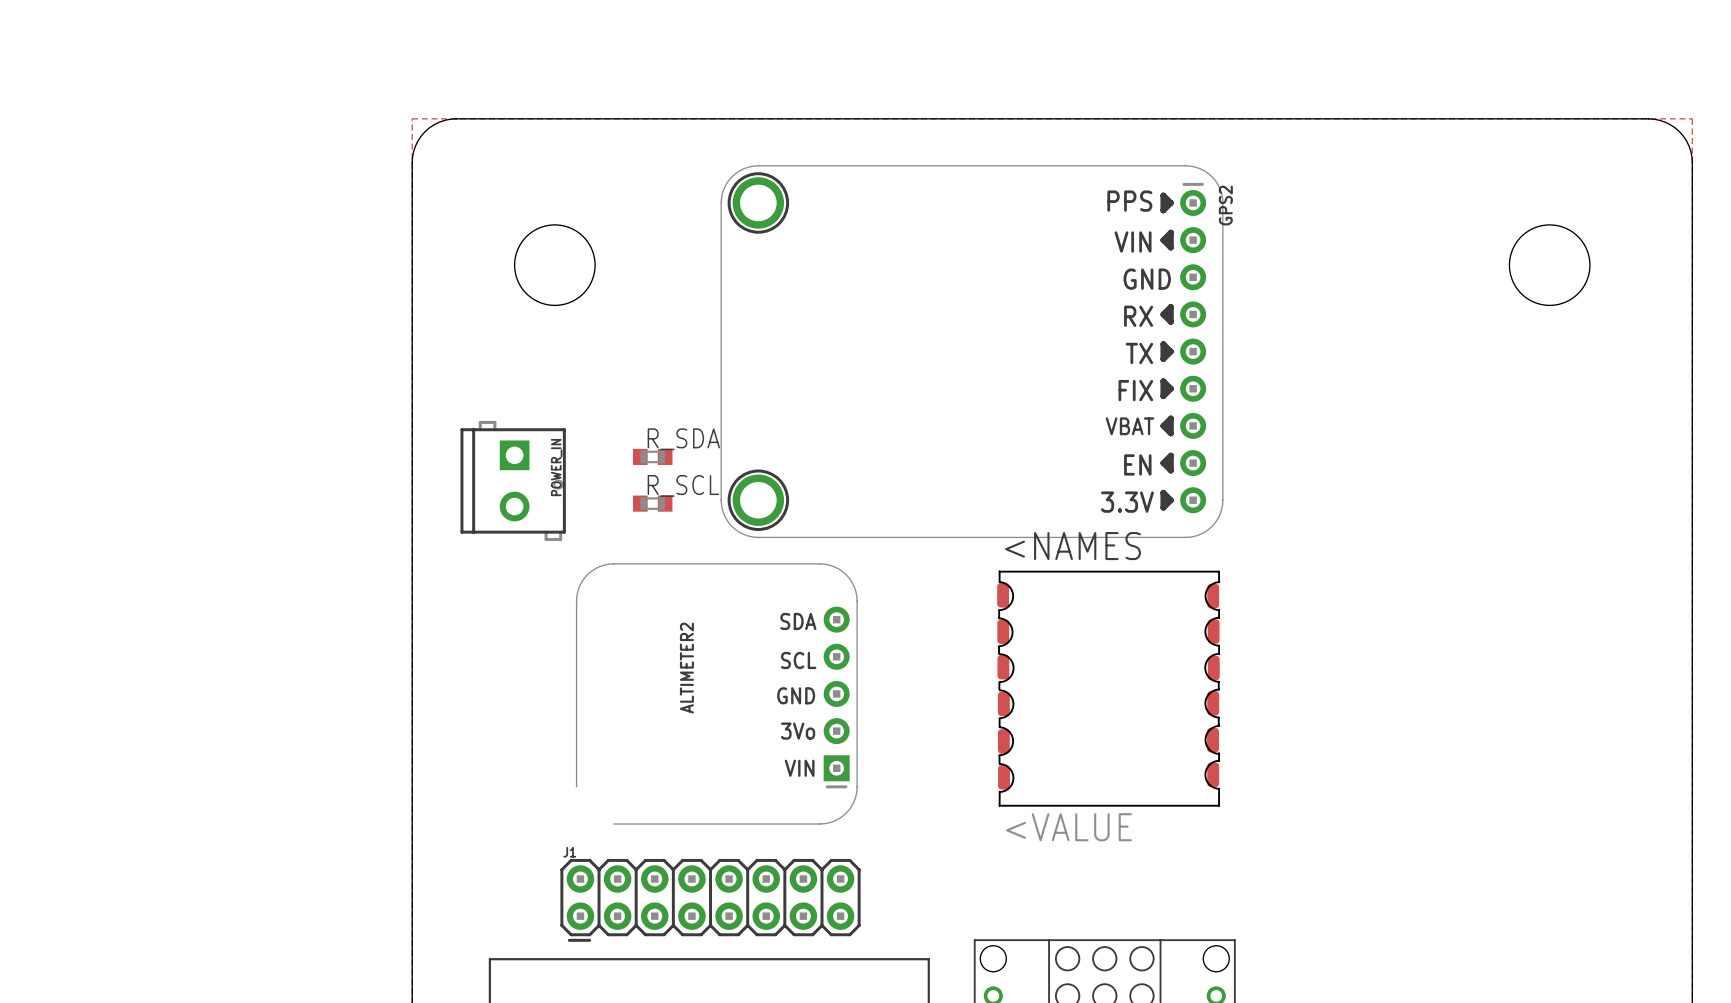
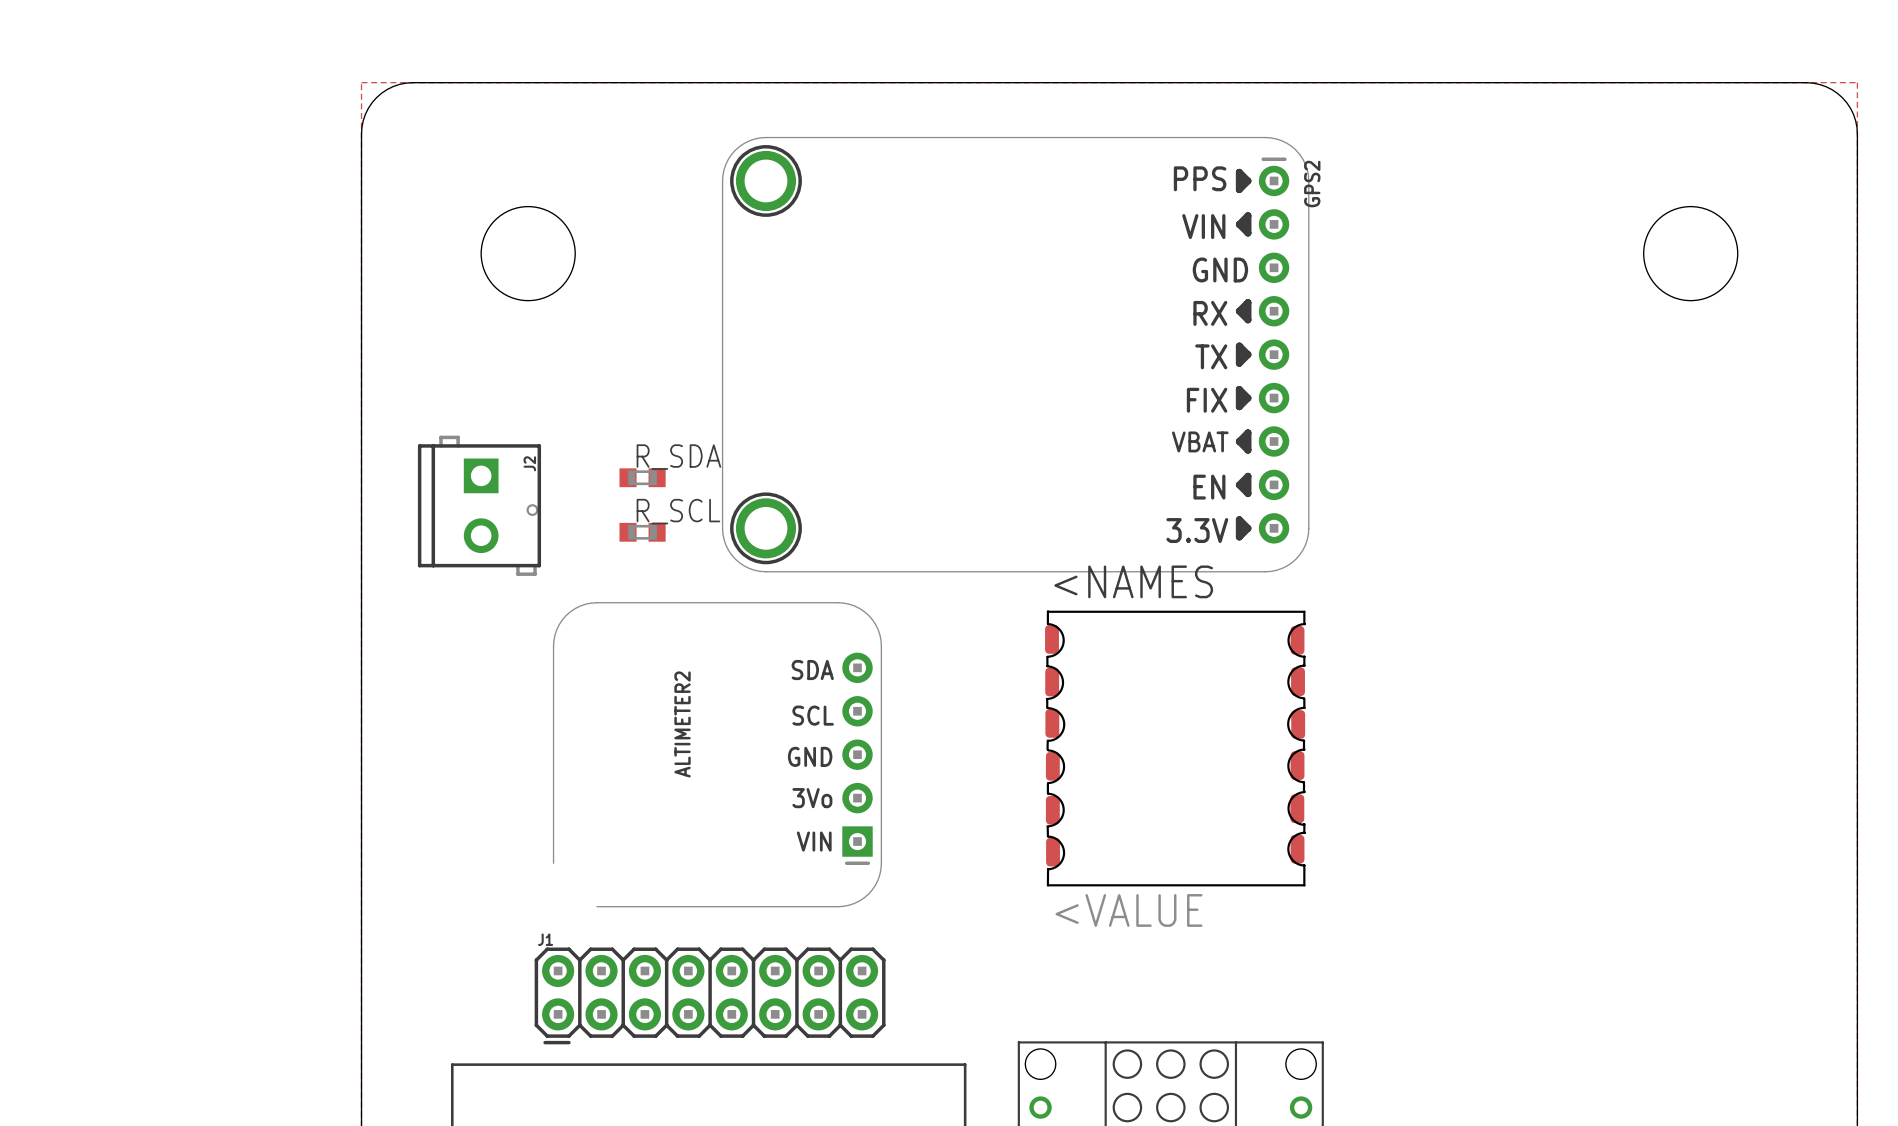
POWER_IN name: POWER_IN (556, 467) -> J2 (529, 463)

